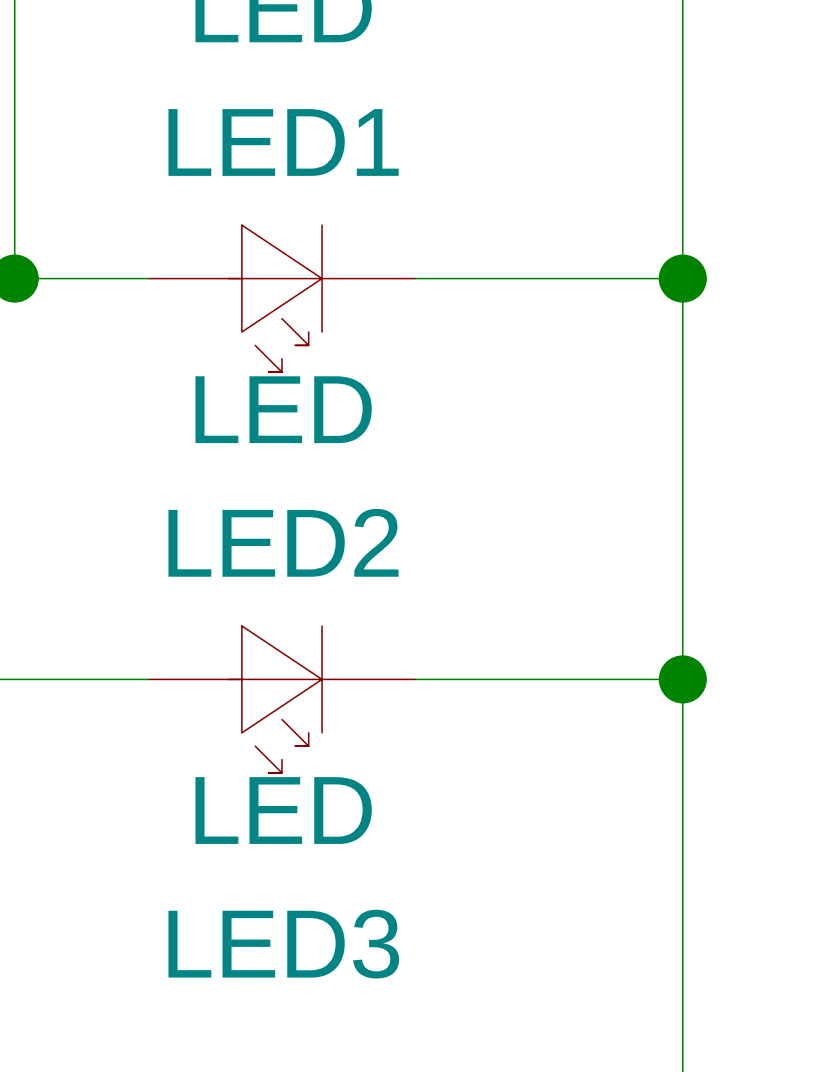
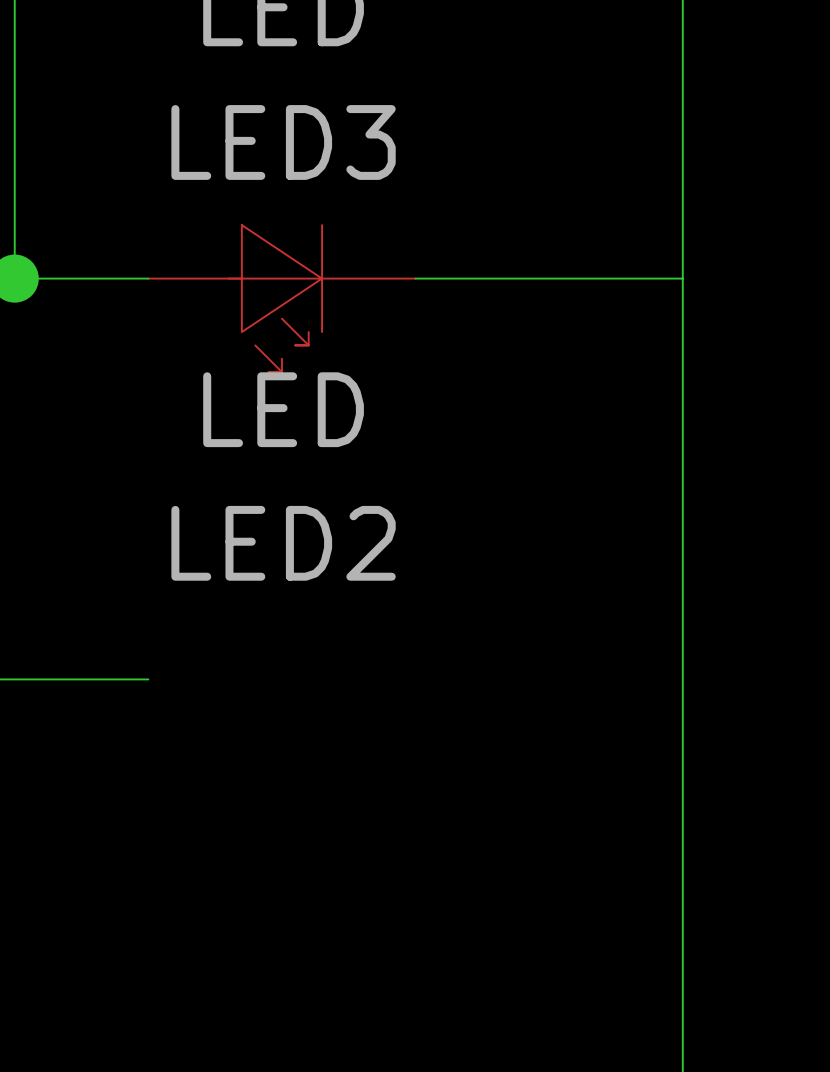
LED1 name: LED1 (283, 142) -> LED3 (283, 142)
junction: (682, 278) -> none
wire: (415, 679) (682, 679) -> none
junction: (682, 679) -> none
LED3: LED (281, 699) -> none

